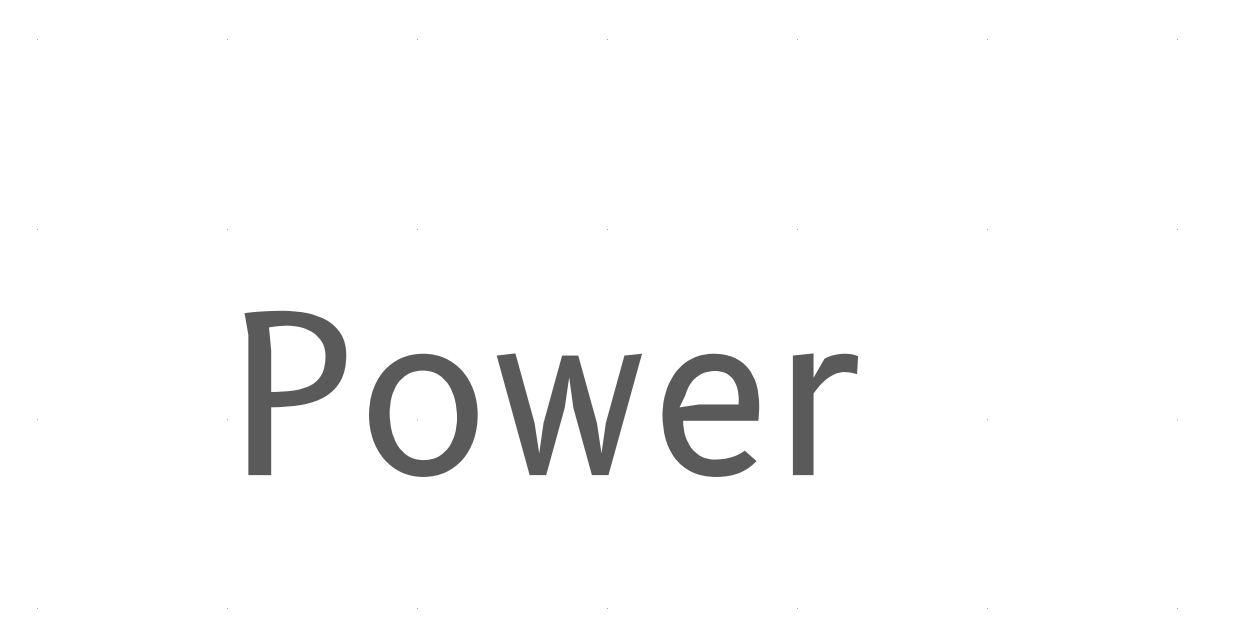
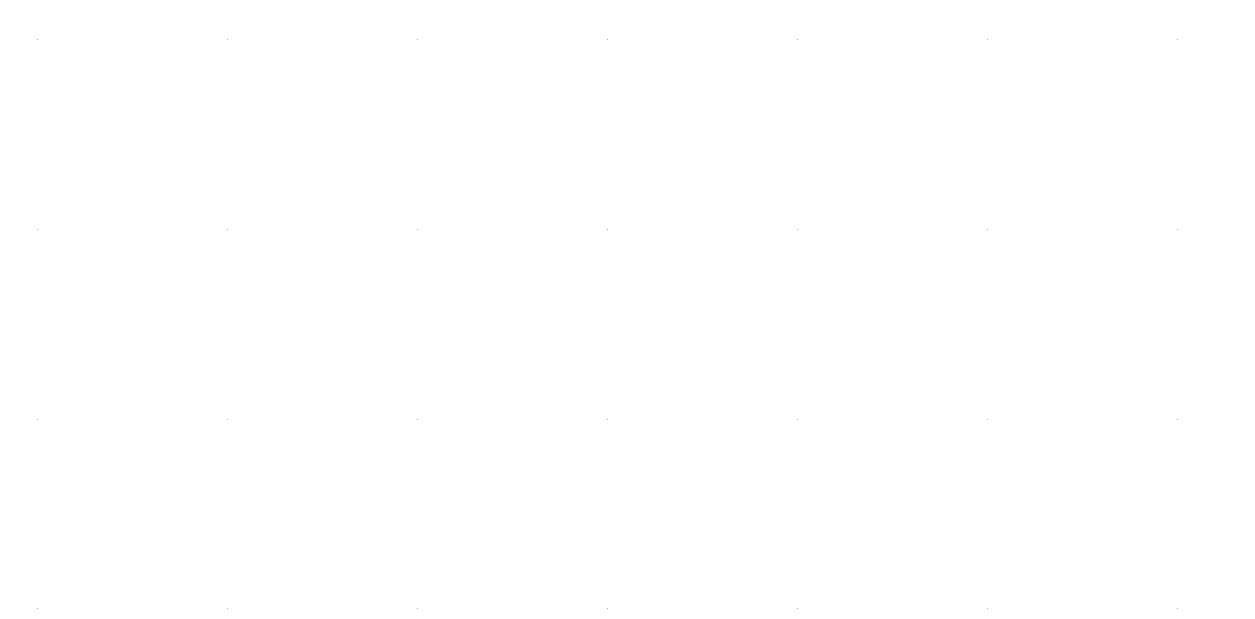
text: Power (551, 393) -> none

